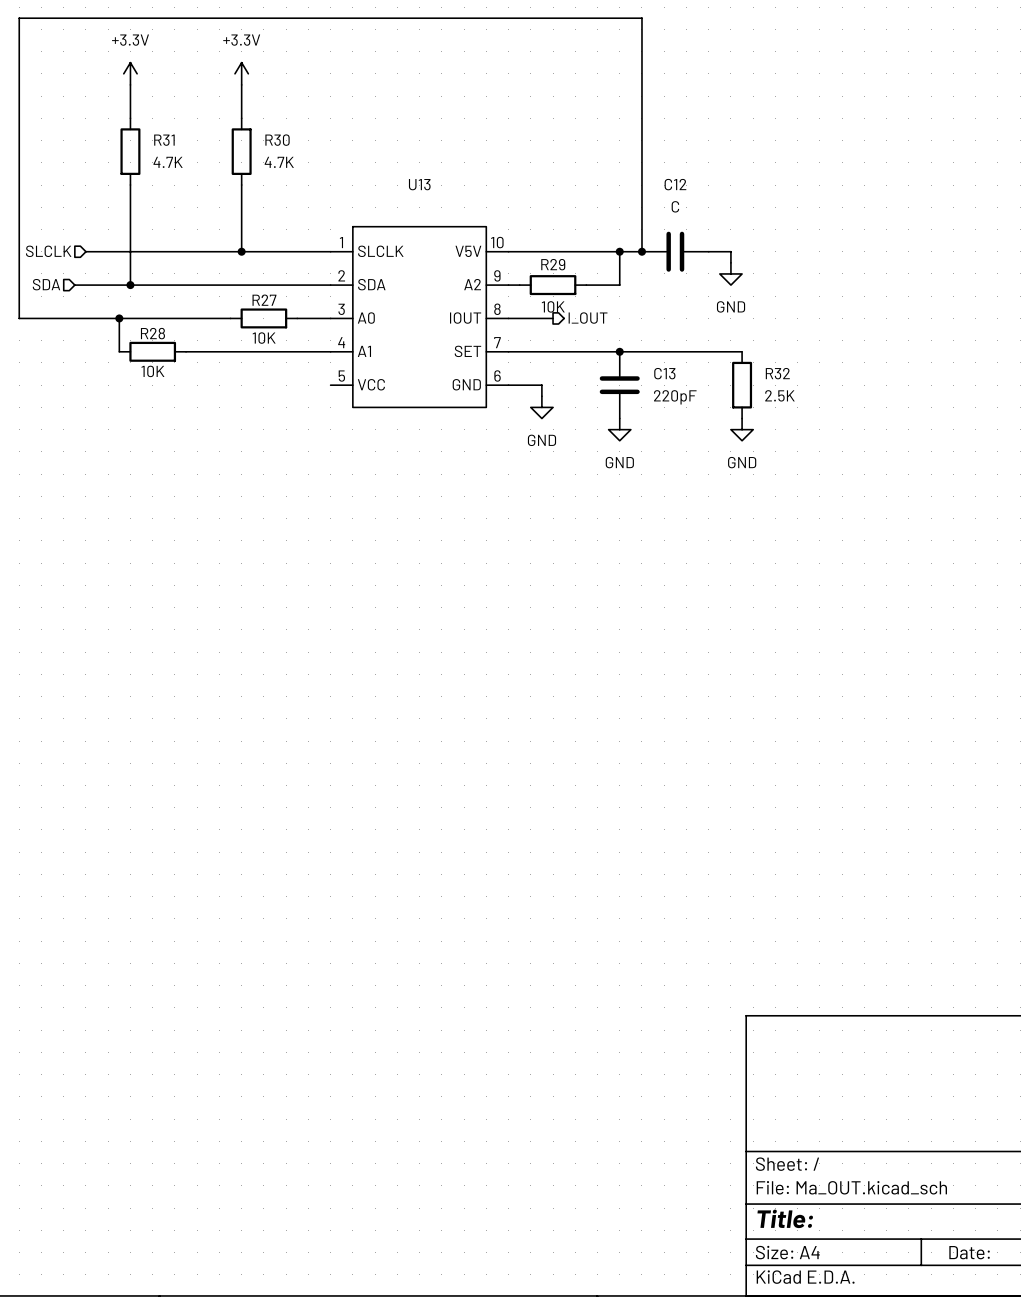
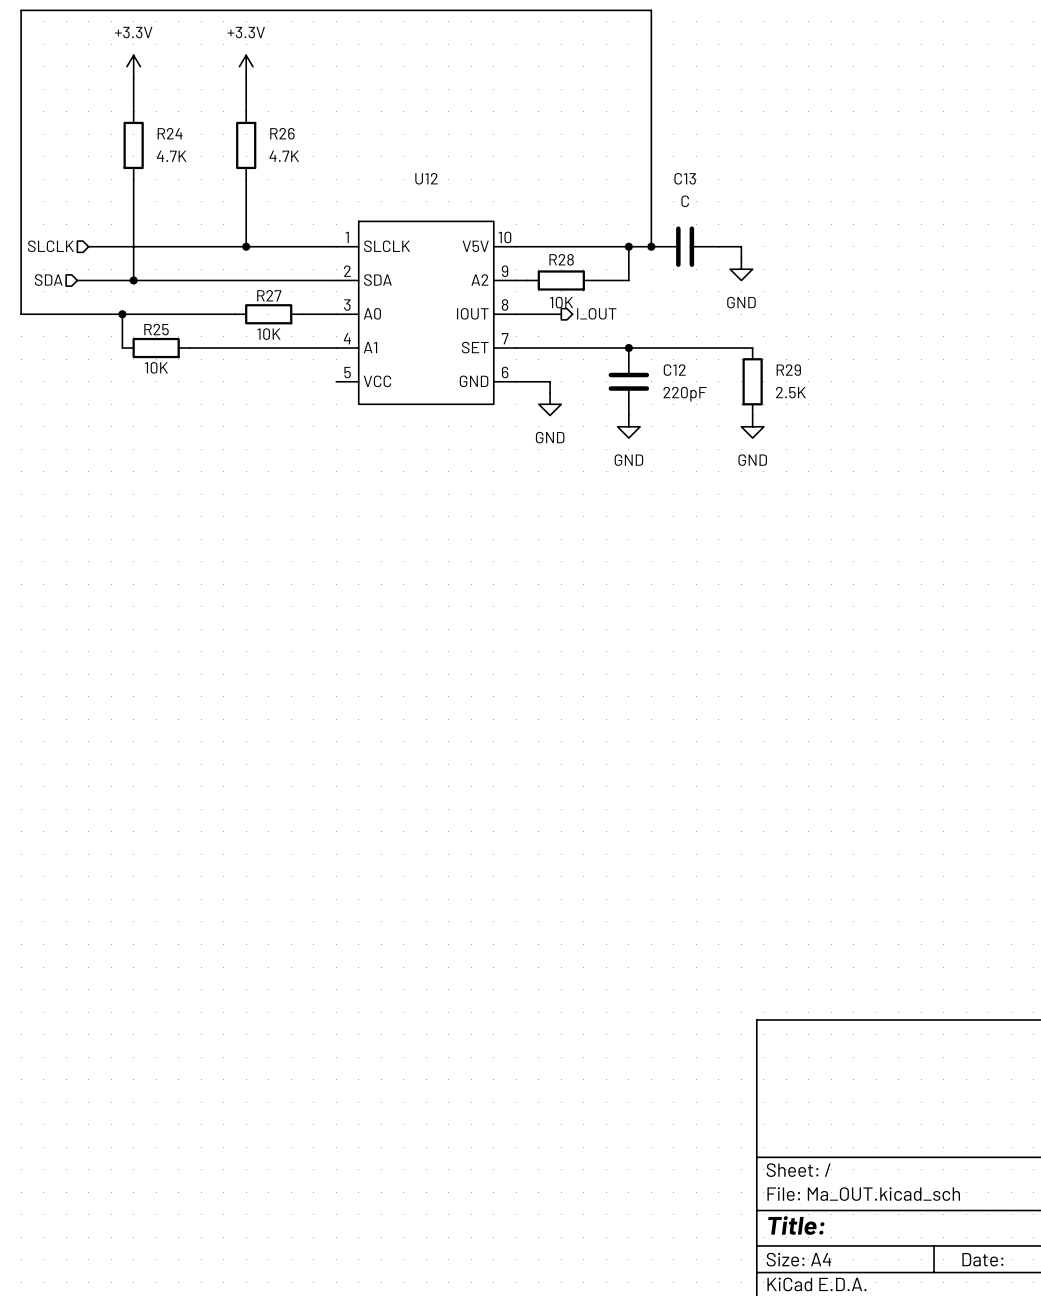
R31 name: R31 (164, 140) -> R24 (170, 133)
R30 name: R30 (277, 140) -> R26 (282, 133)
U13 name: U13 (419, 184) -> U12 (426, 178)
C12 name: C12 (675, 184) -> C13 (685, 178)
R29 name: R29 (553, 264) -> R28 (561, 259)
R28 name: R28 (152, 333) -> R25 (156, 329)
C13 name: C13 (664, 373) -> C12 (674, 370)
R32 name: R32 (777, 373) -> R29 (788, 370)

